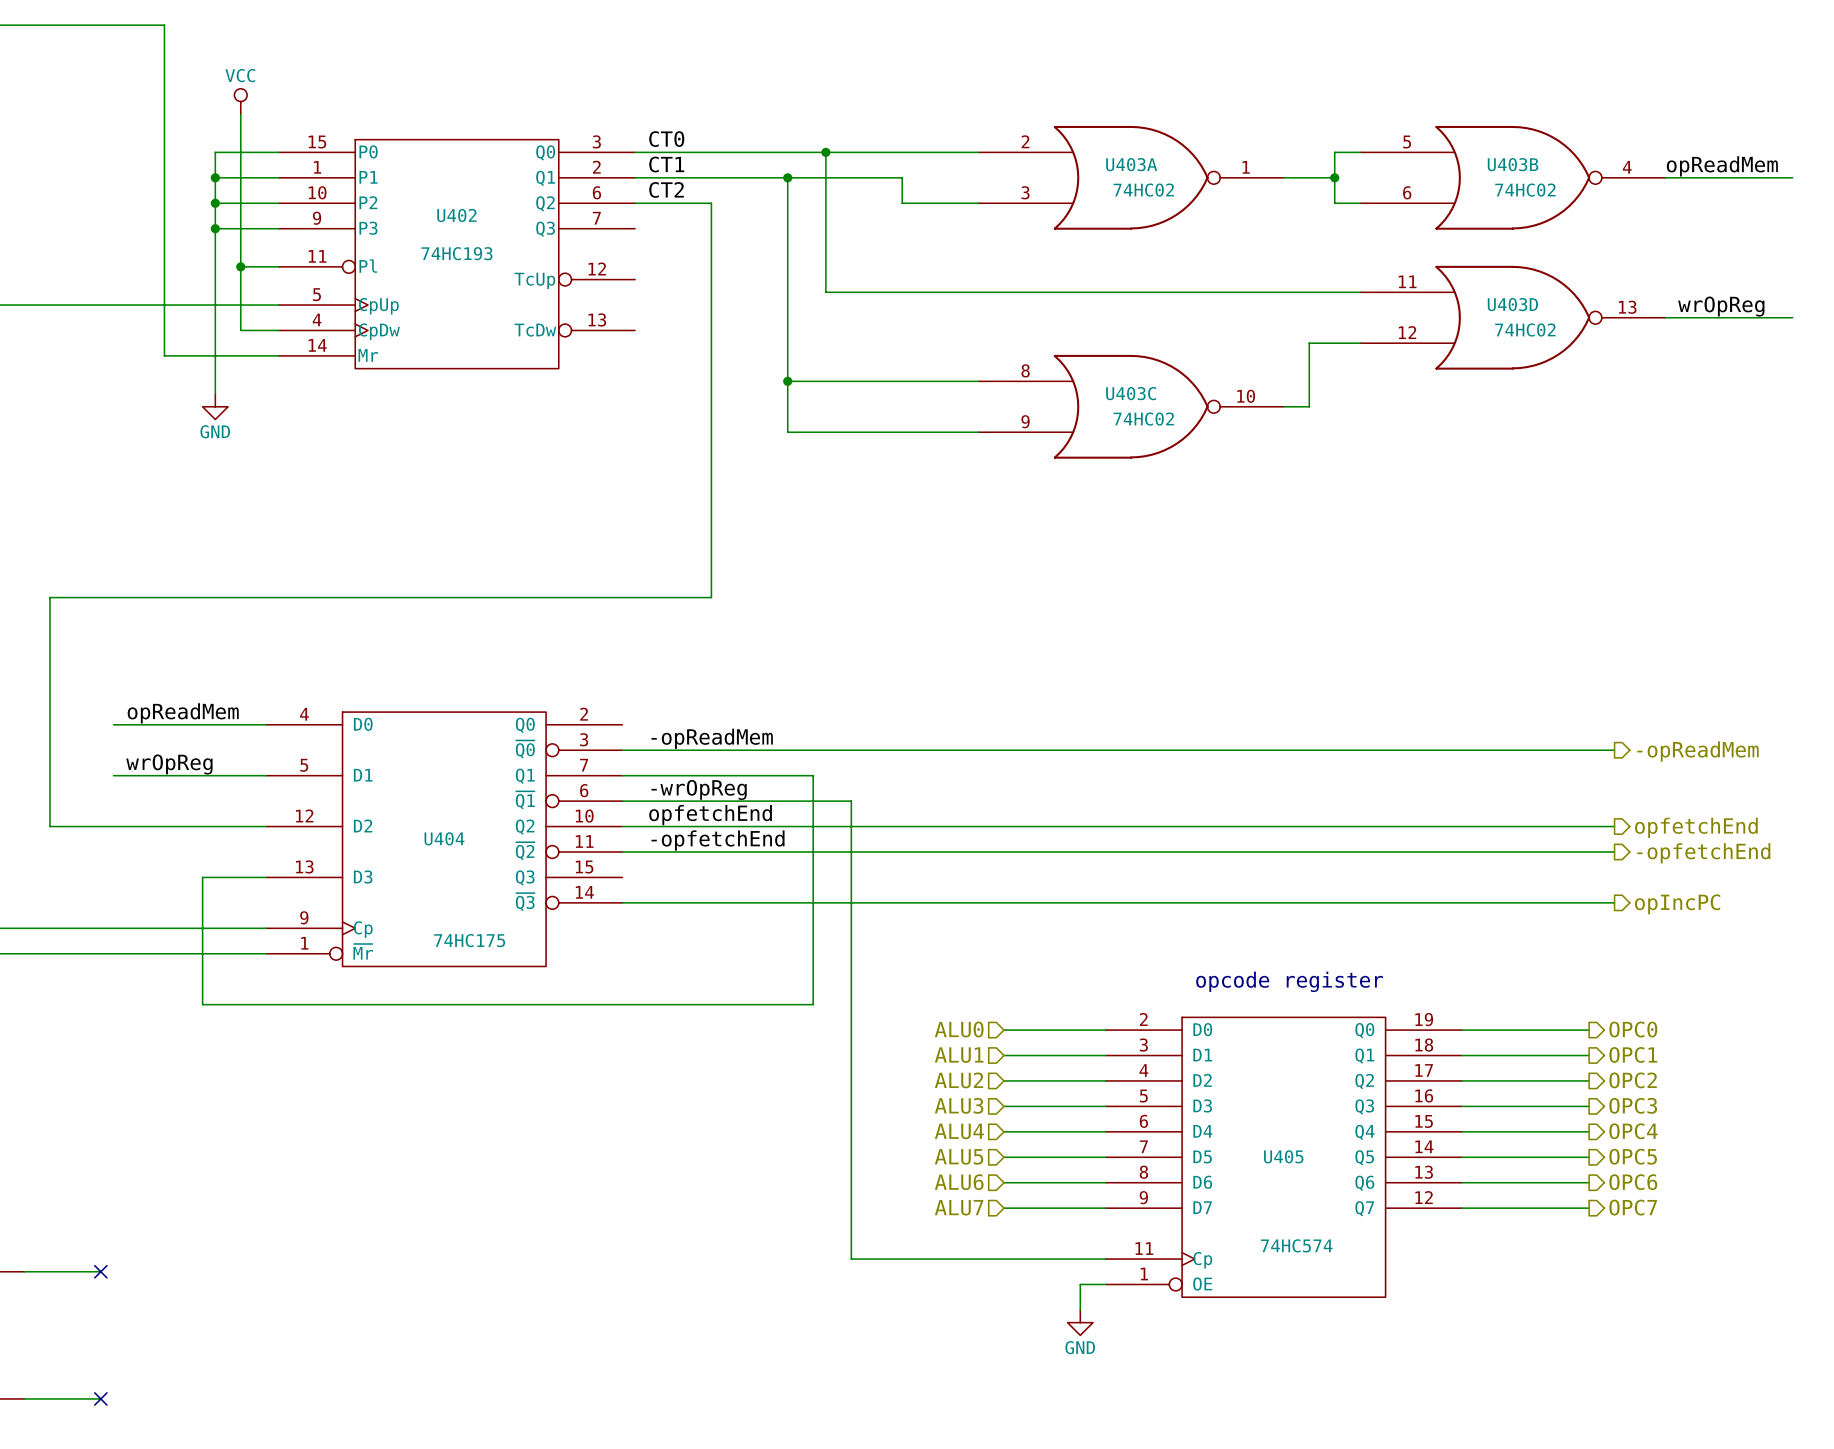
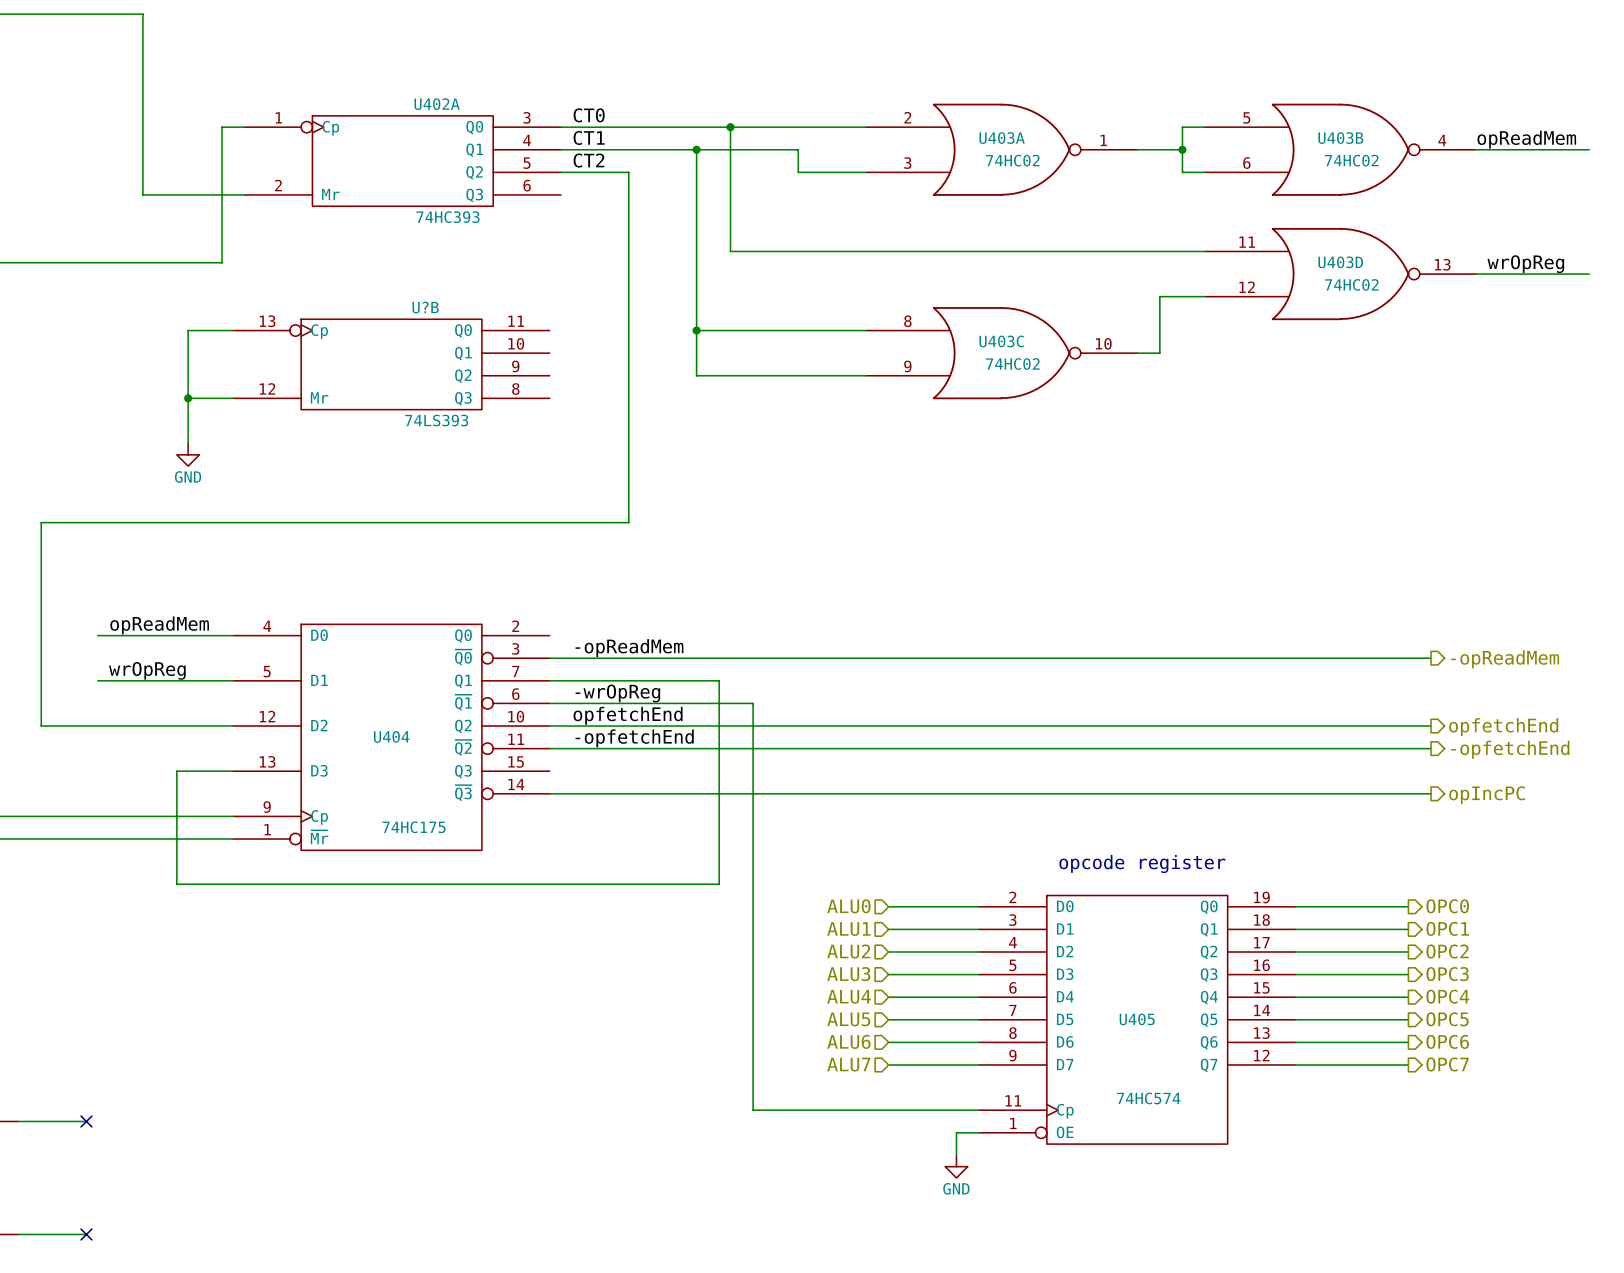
power symbol: VCC (240, 101) -> none
wire: (240, 114) (240, 330) (278, 330) -> none
wire: (253, 152) (215, 152) (215, 381) -> (222, 127) (222, 262)
wire: (215, 177) (278, 177) -> none
junction: (215, 177) -> none
U402A: none -> 74HC393 (402, 161)
wire: (215, 203) (278, 203) -> none
junction: (215, 203) -> none
wire: (164, 228) (164, 355) (278, 355) -> (142, 194) (188, 194)
junction: (215, 228) -> none
U402: 74HC193 (457, 254) -> none
wire: (240, 266) (278, 266) -> none
junction: (240, 266) -> none
wire: (253, 305) (278, 305) -> none
wire: none -> (188, 330) (233, 330)
wire: none -> (188, 341) (188, 443)
power symbol position: GND (215, 406) -> GND (188, 454)
U?B: none -> 74LS393 (391, 364)
wire: none -> (188, 398) (233, 398)
junction: none -> (188, 398)

